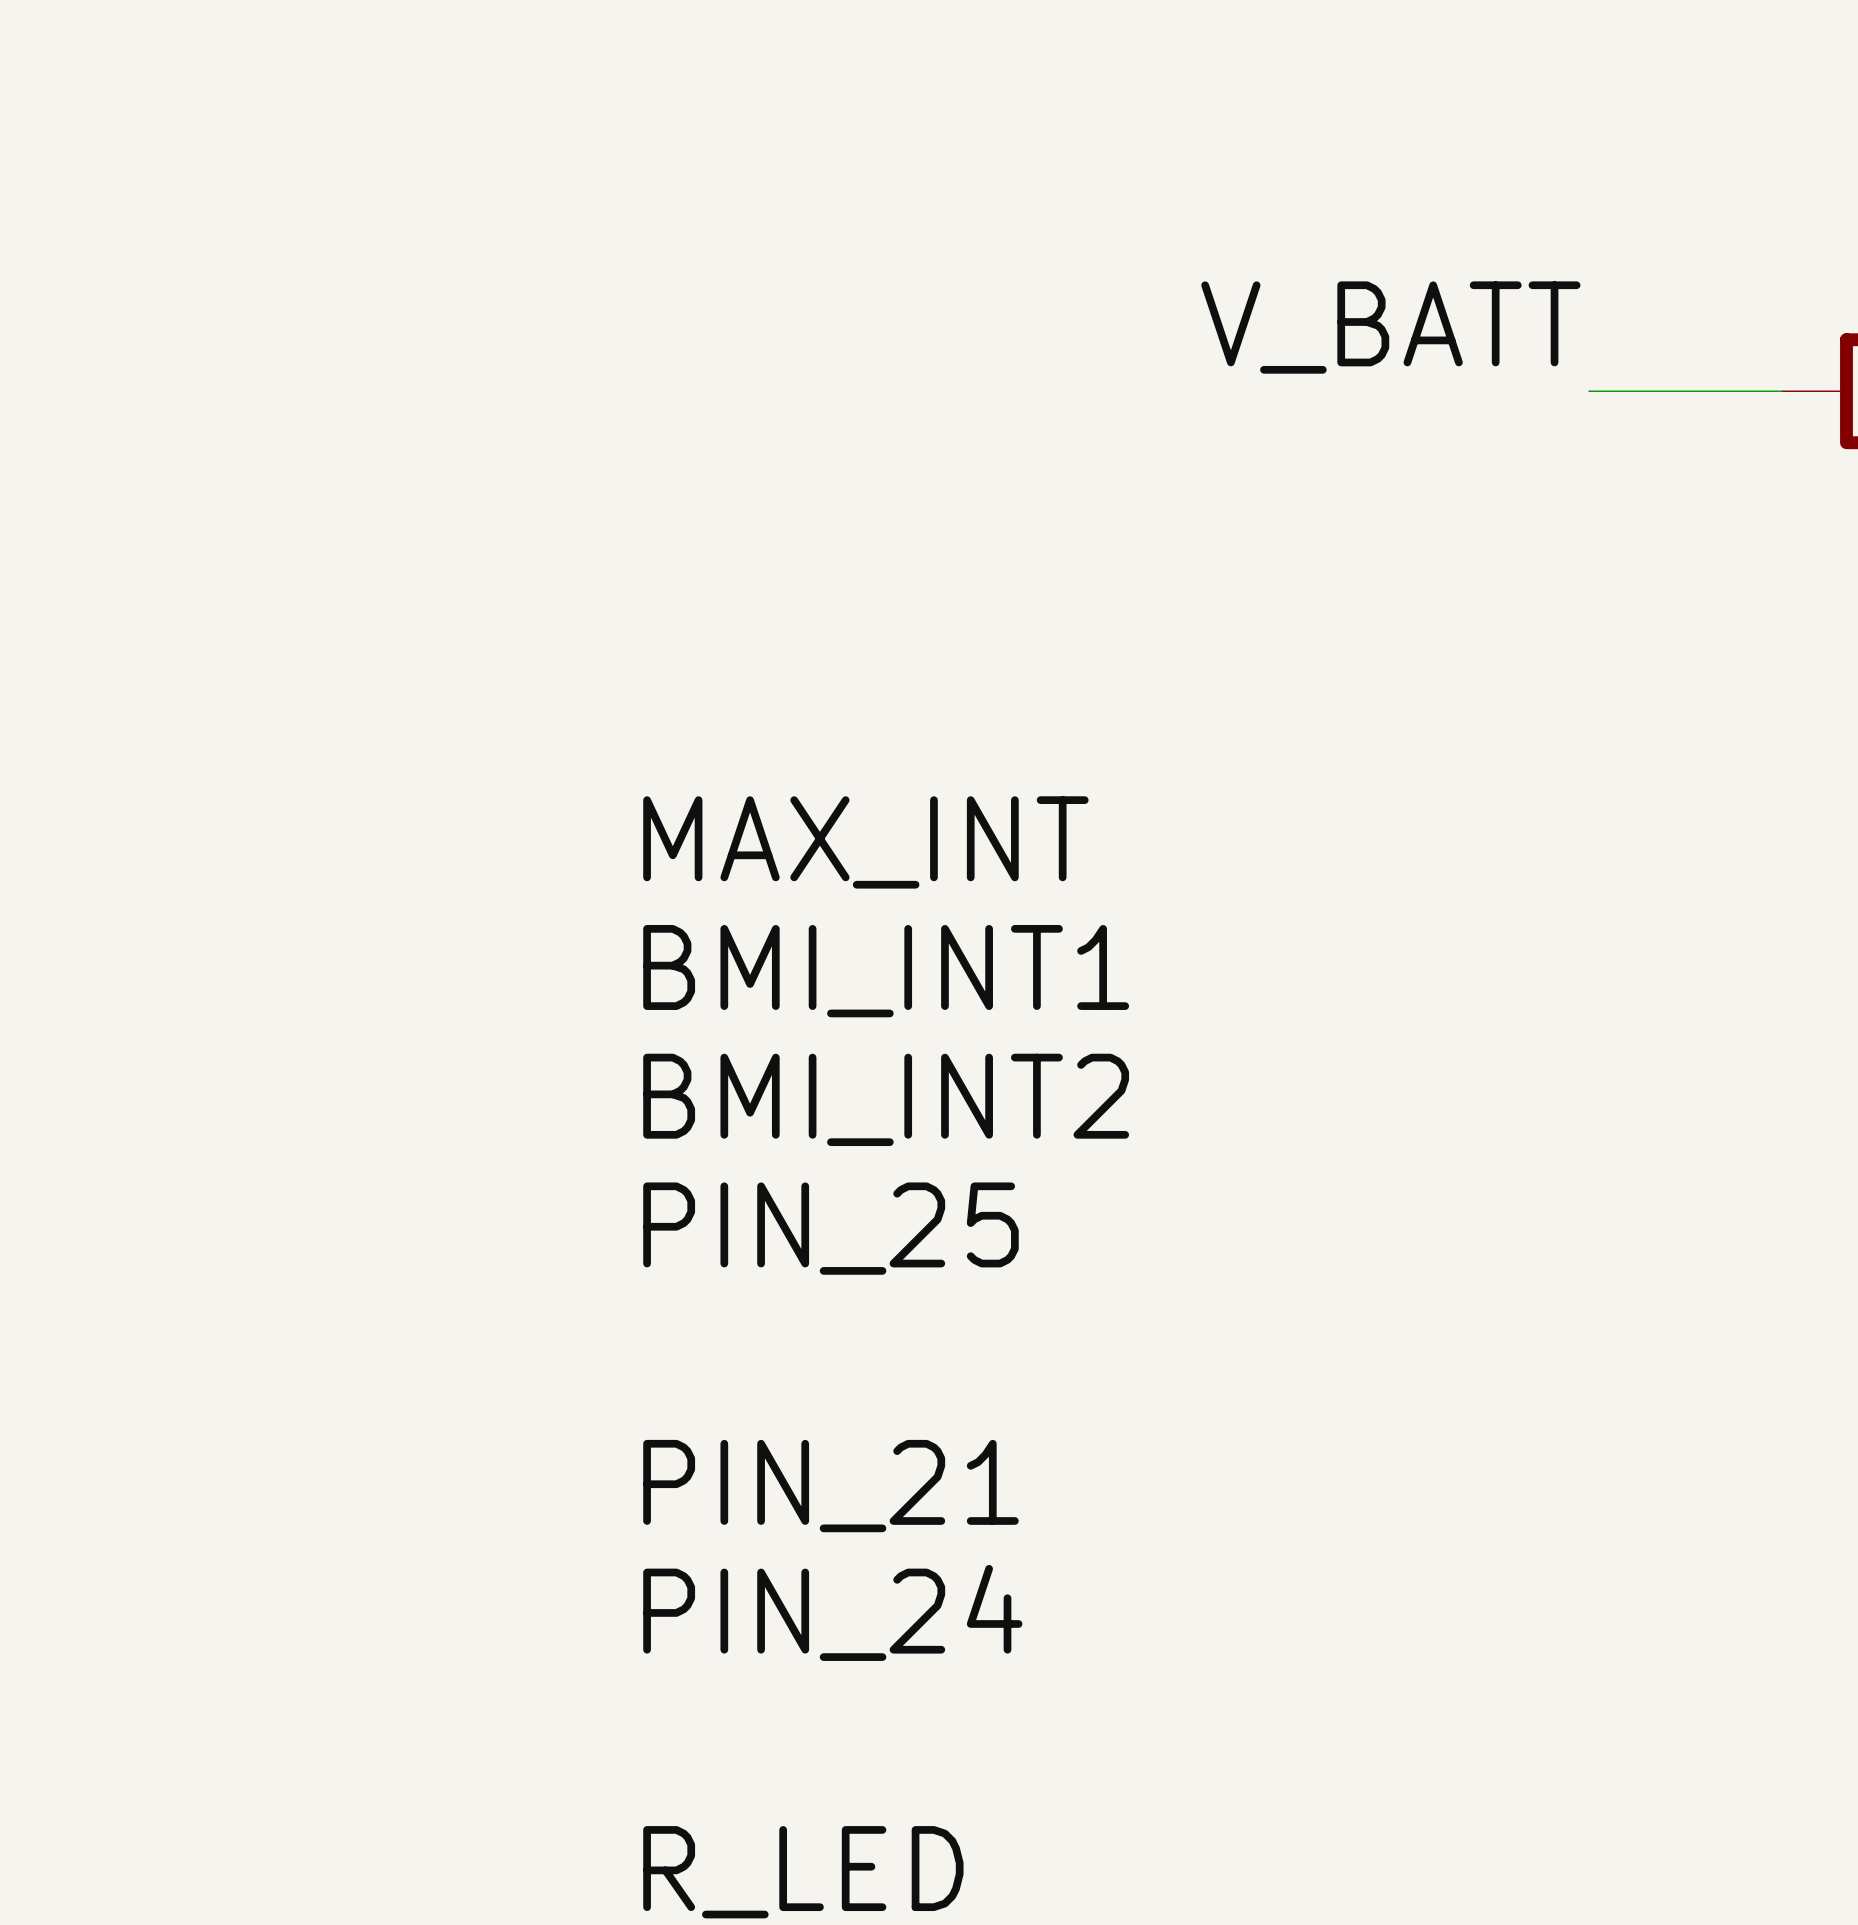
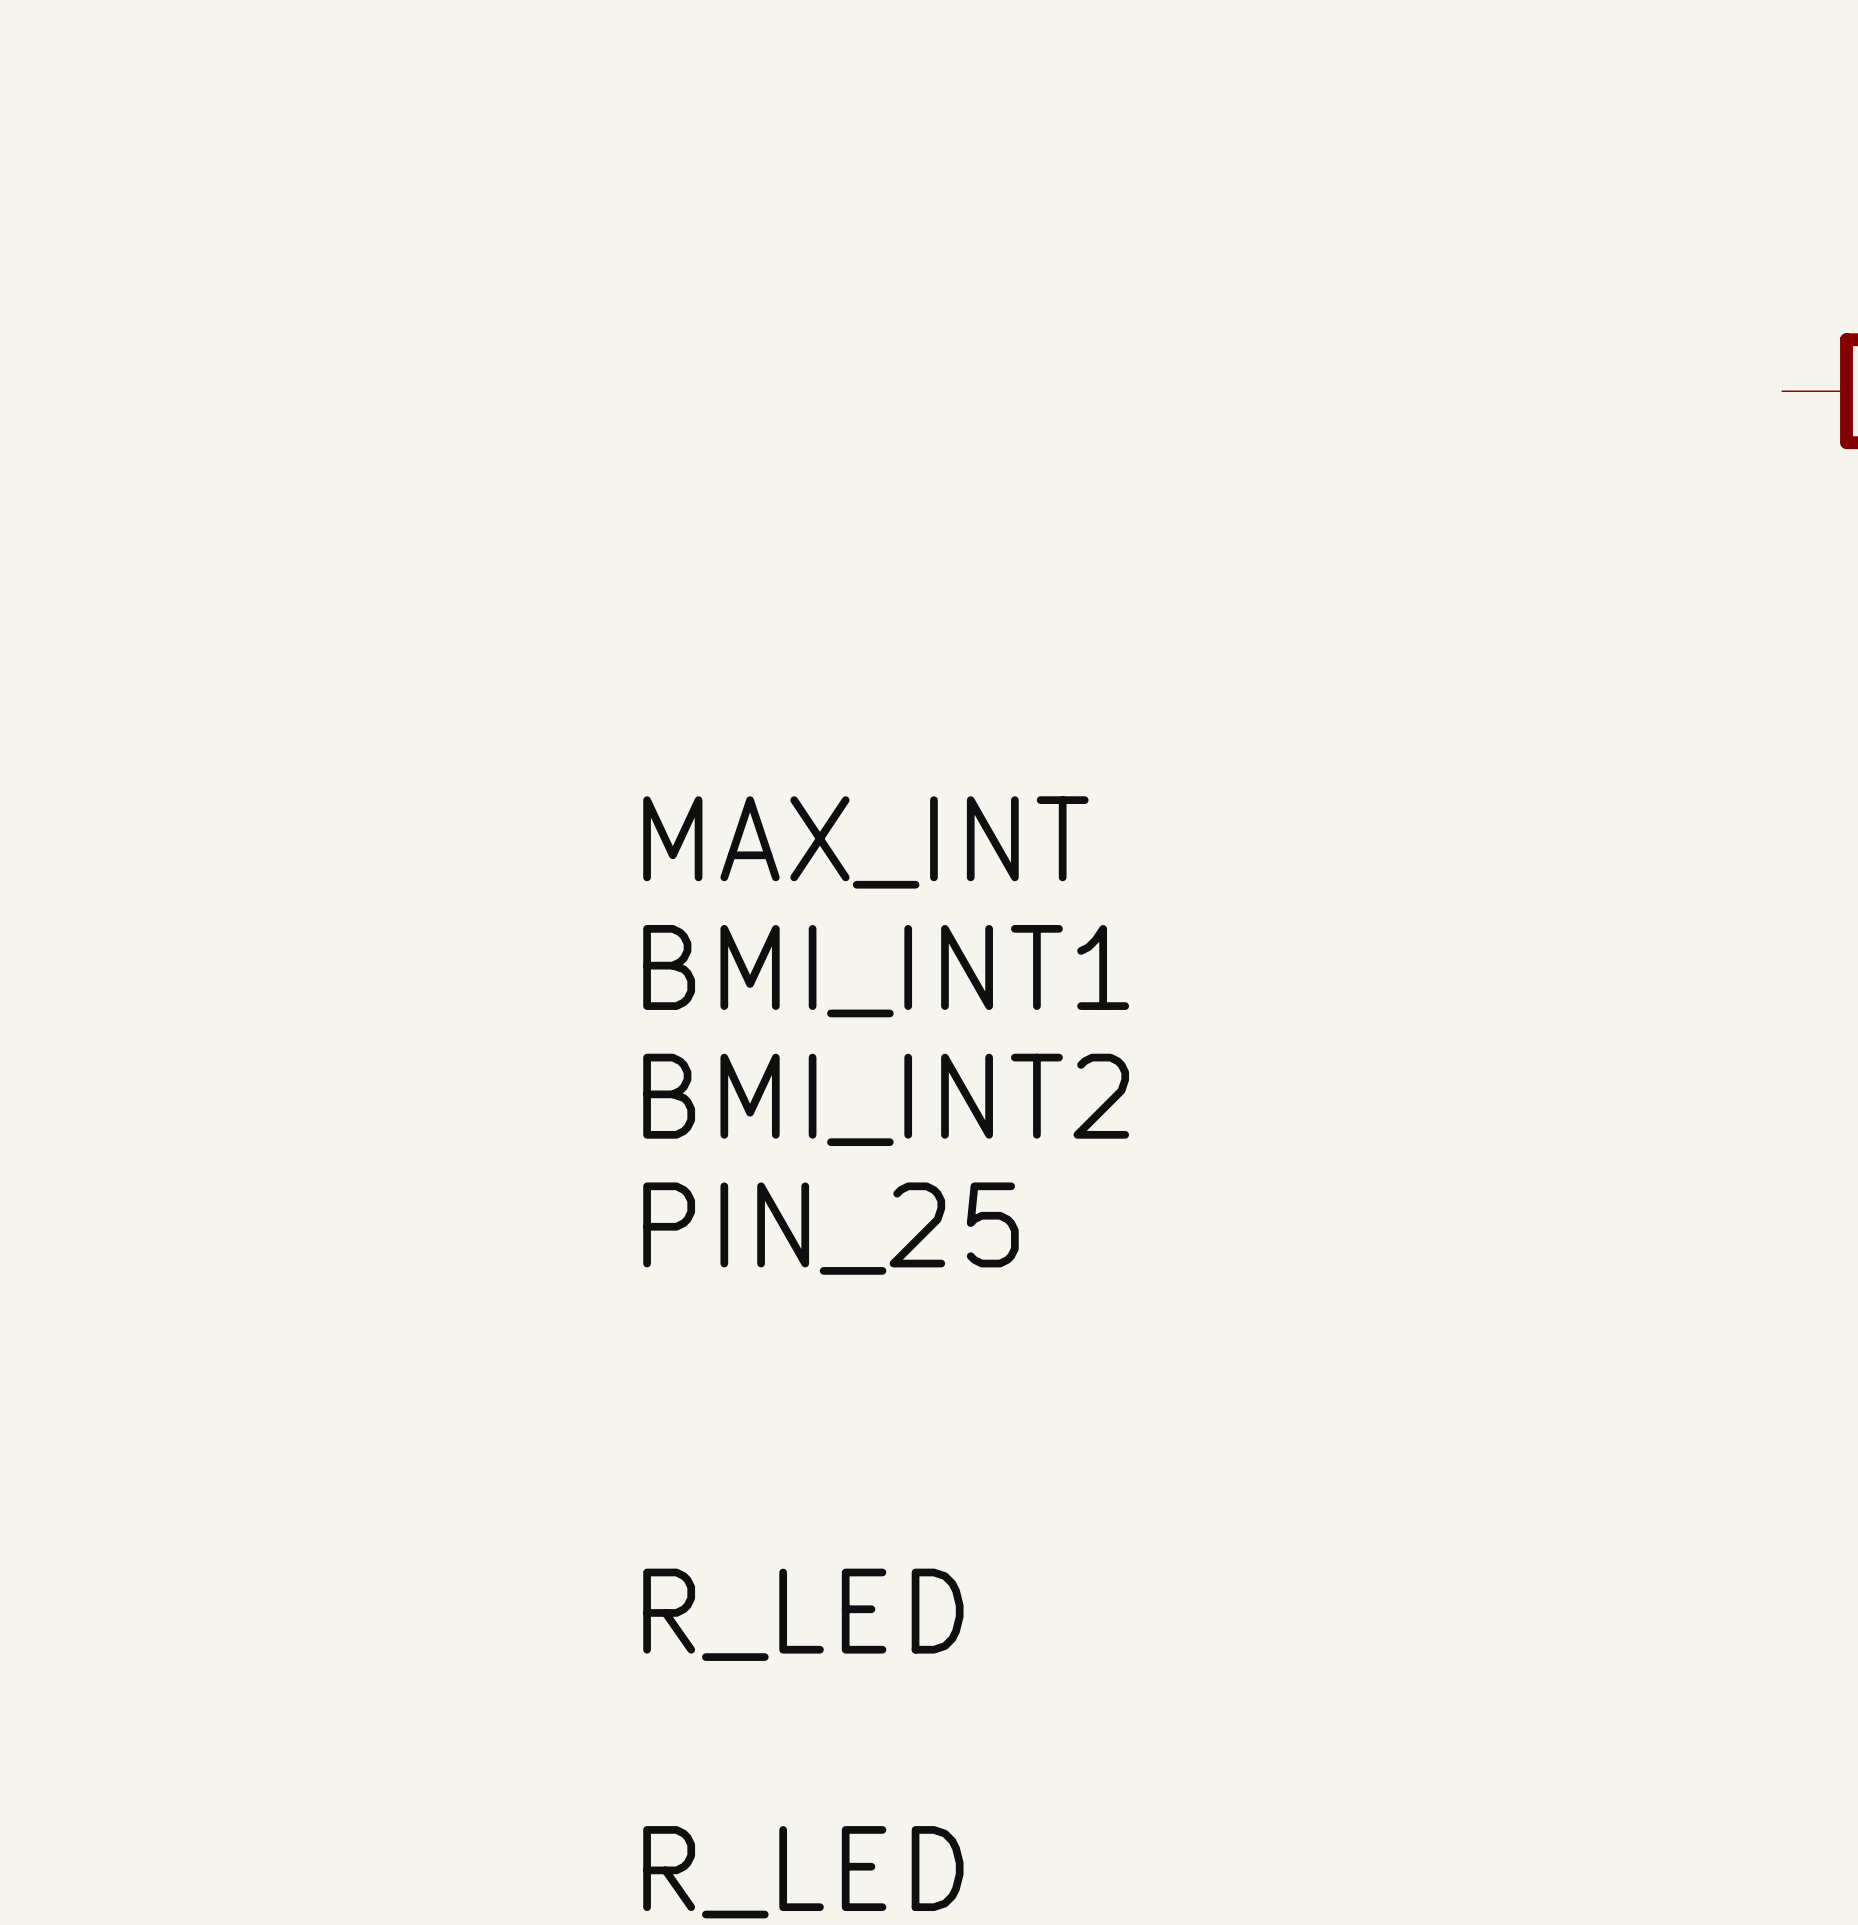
label: V_BATT (1390, 327) -> none
wire: (1589, 391) (1782, 391) -> none
label: PIN_21 (830, 1486) -> none
label: PIN_24 (832, 1612) -> R_LED (803, 1614)

